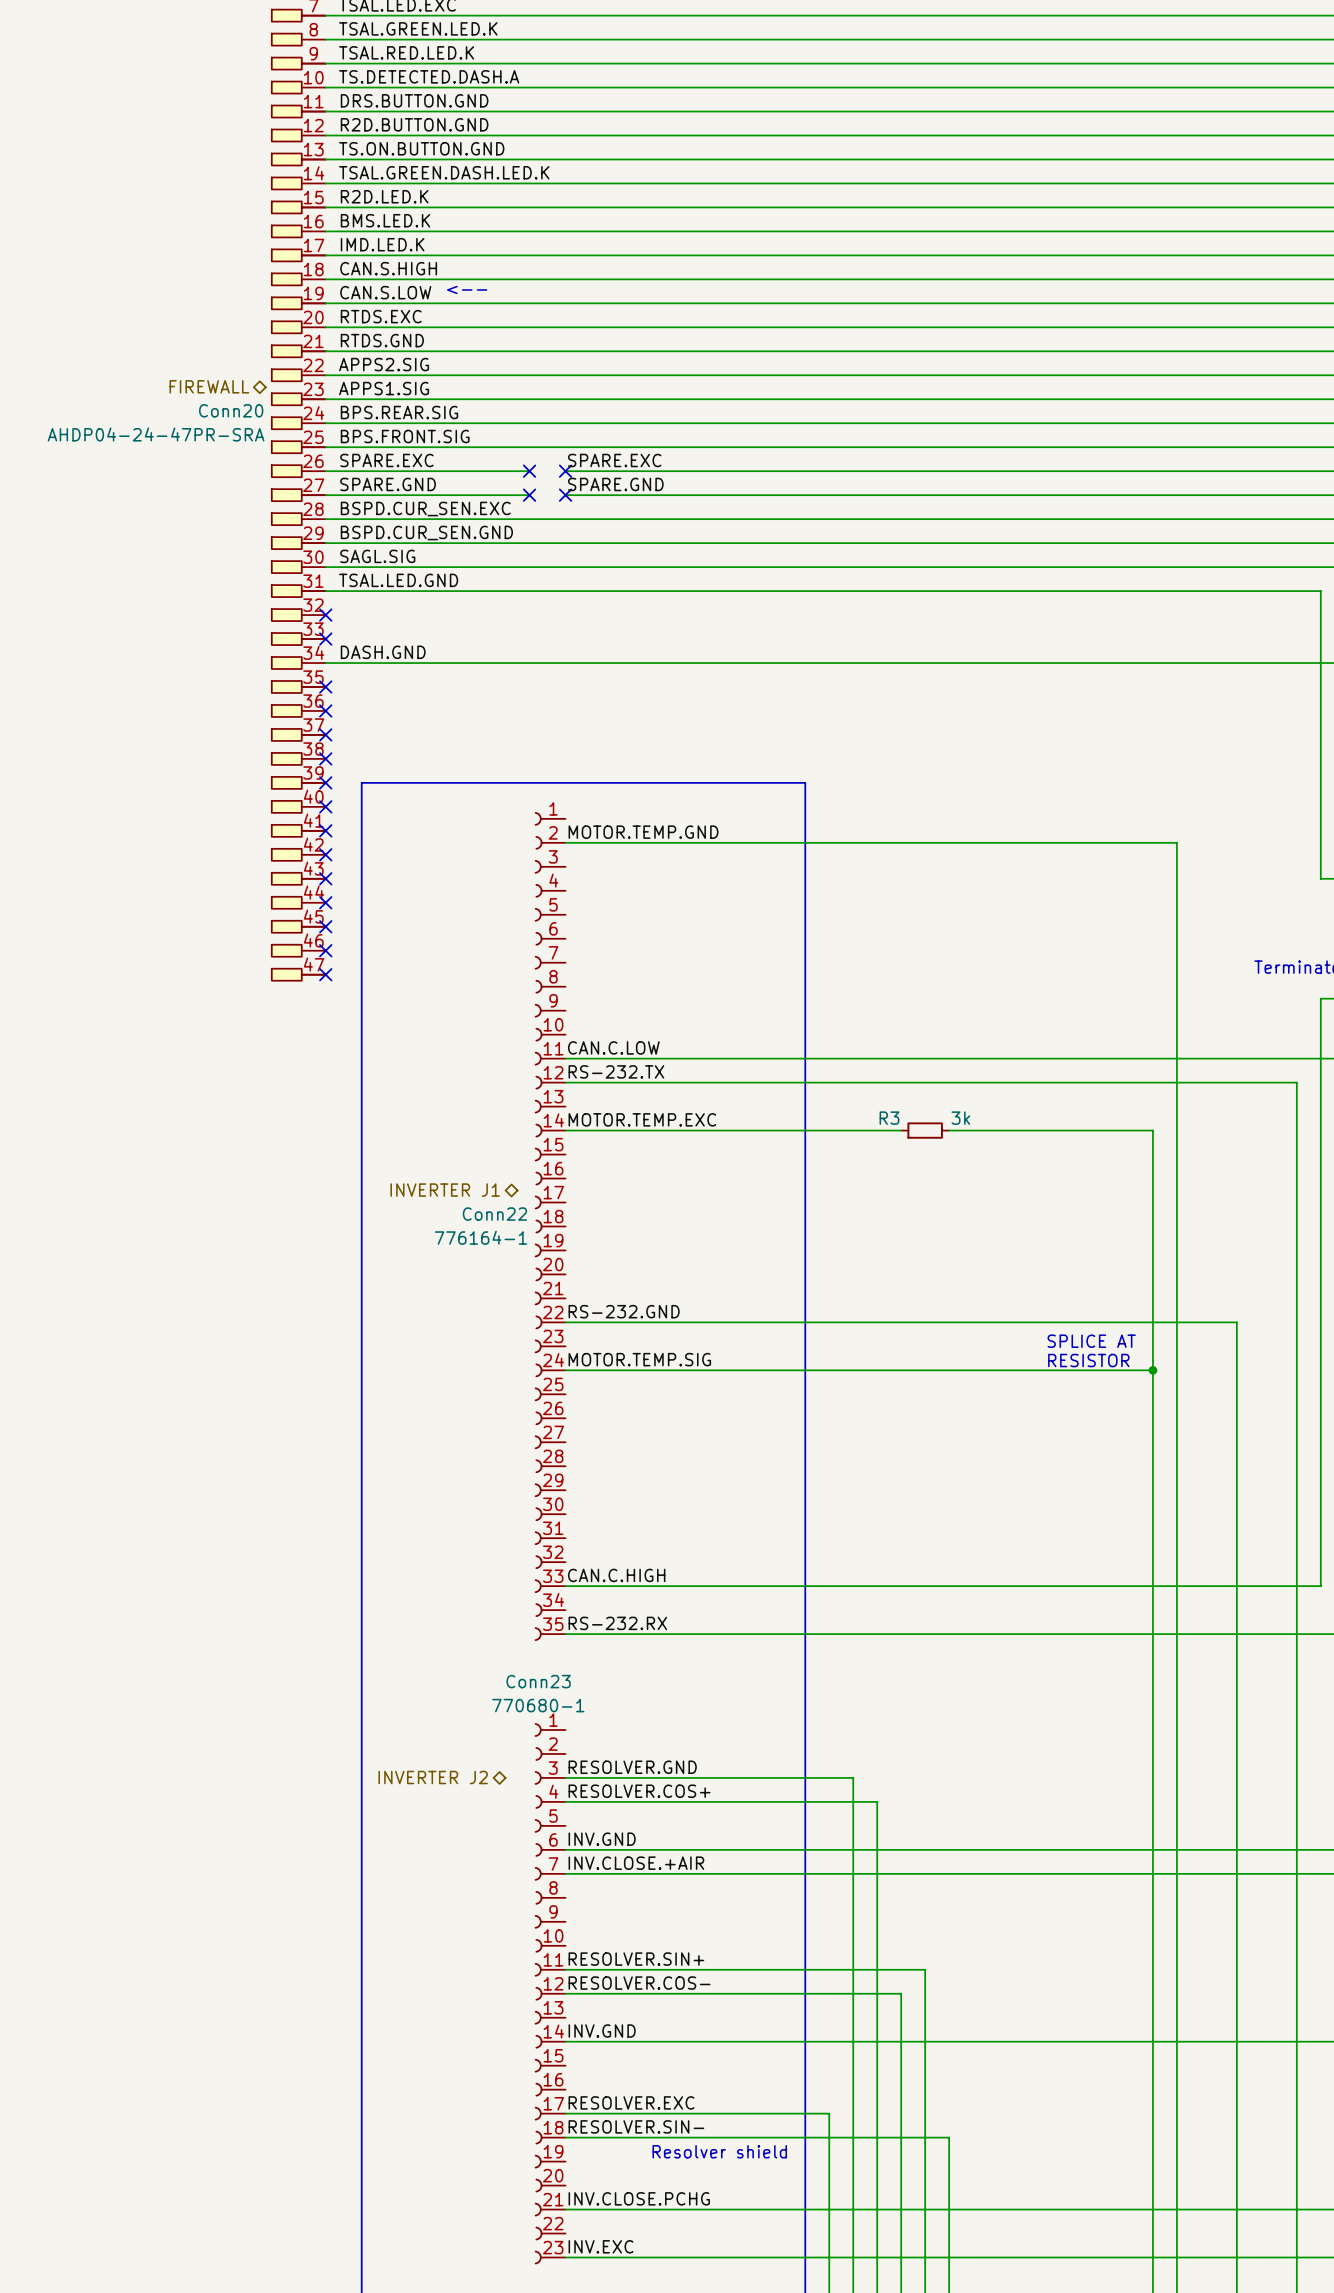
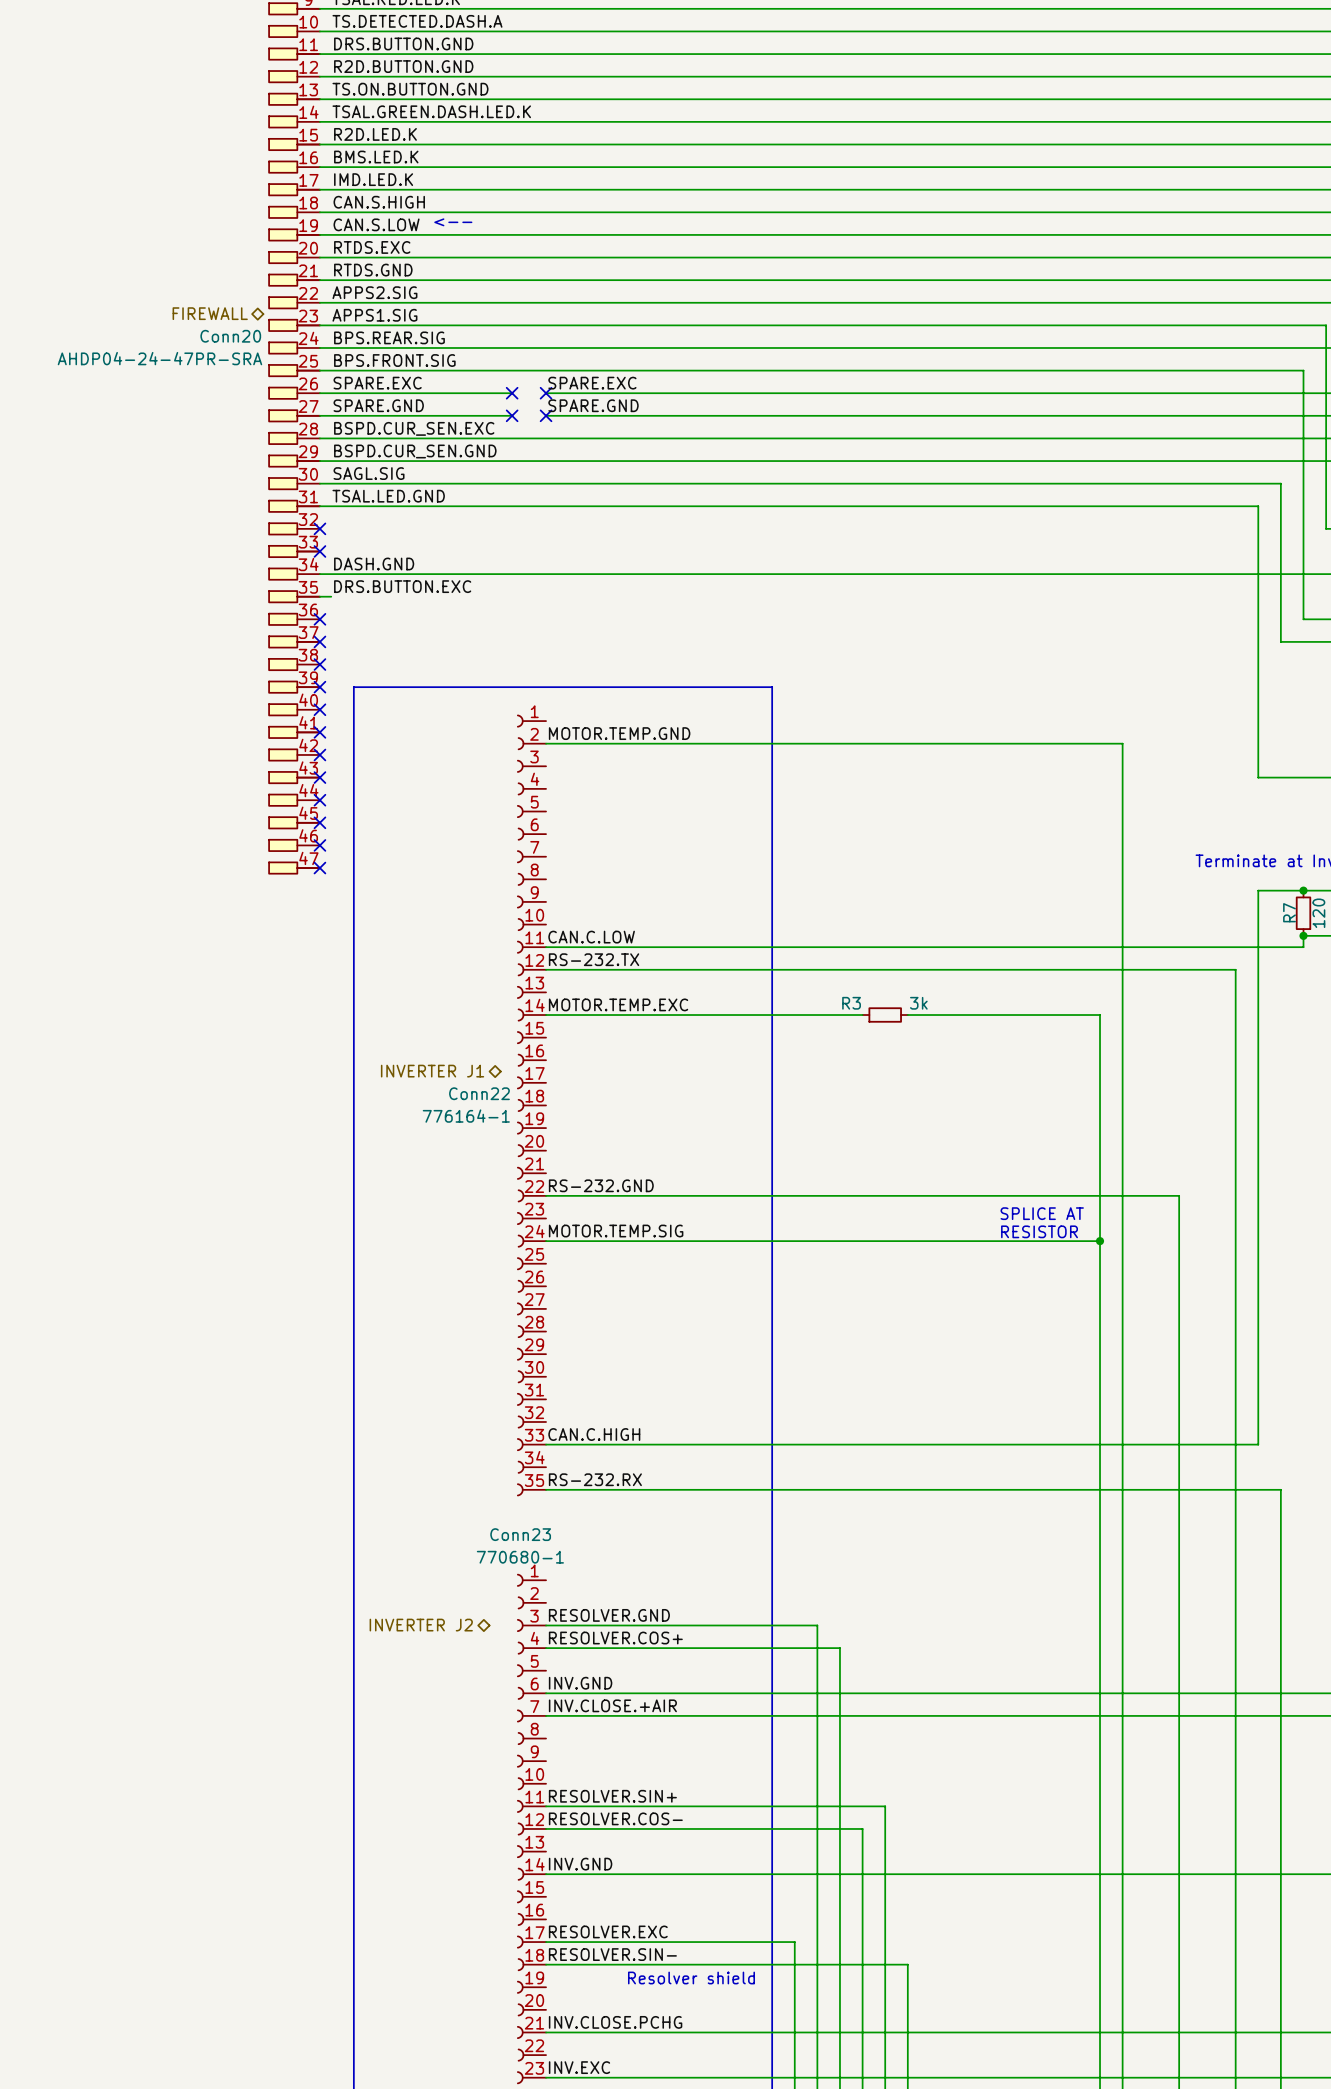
label: none -> DRS.BUTTON.EXC (402, 586)
wire: none -> (319, 596) (331, 596)
no-connect mark: (325, 686) -> none

